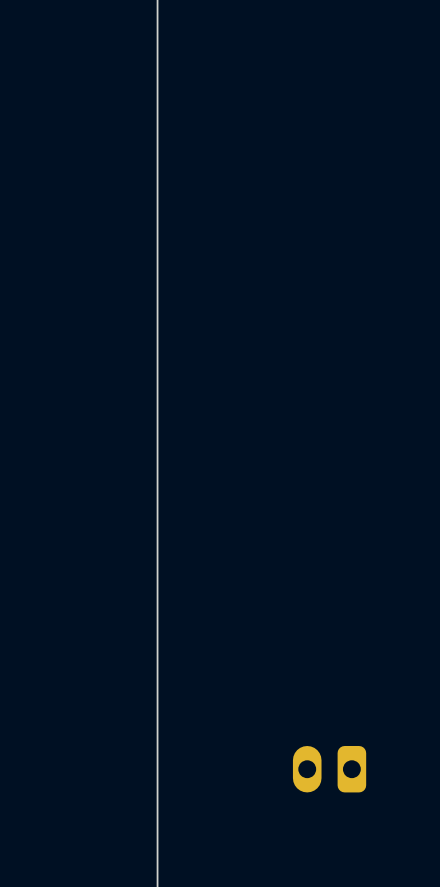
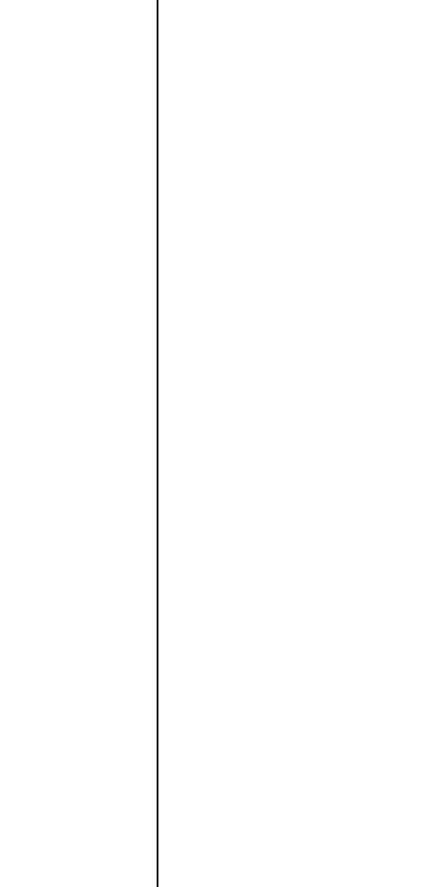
part: (329, 769) -> none

